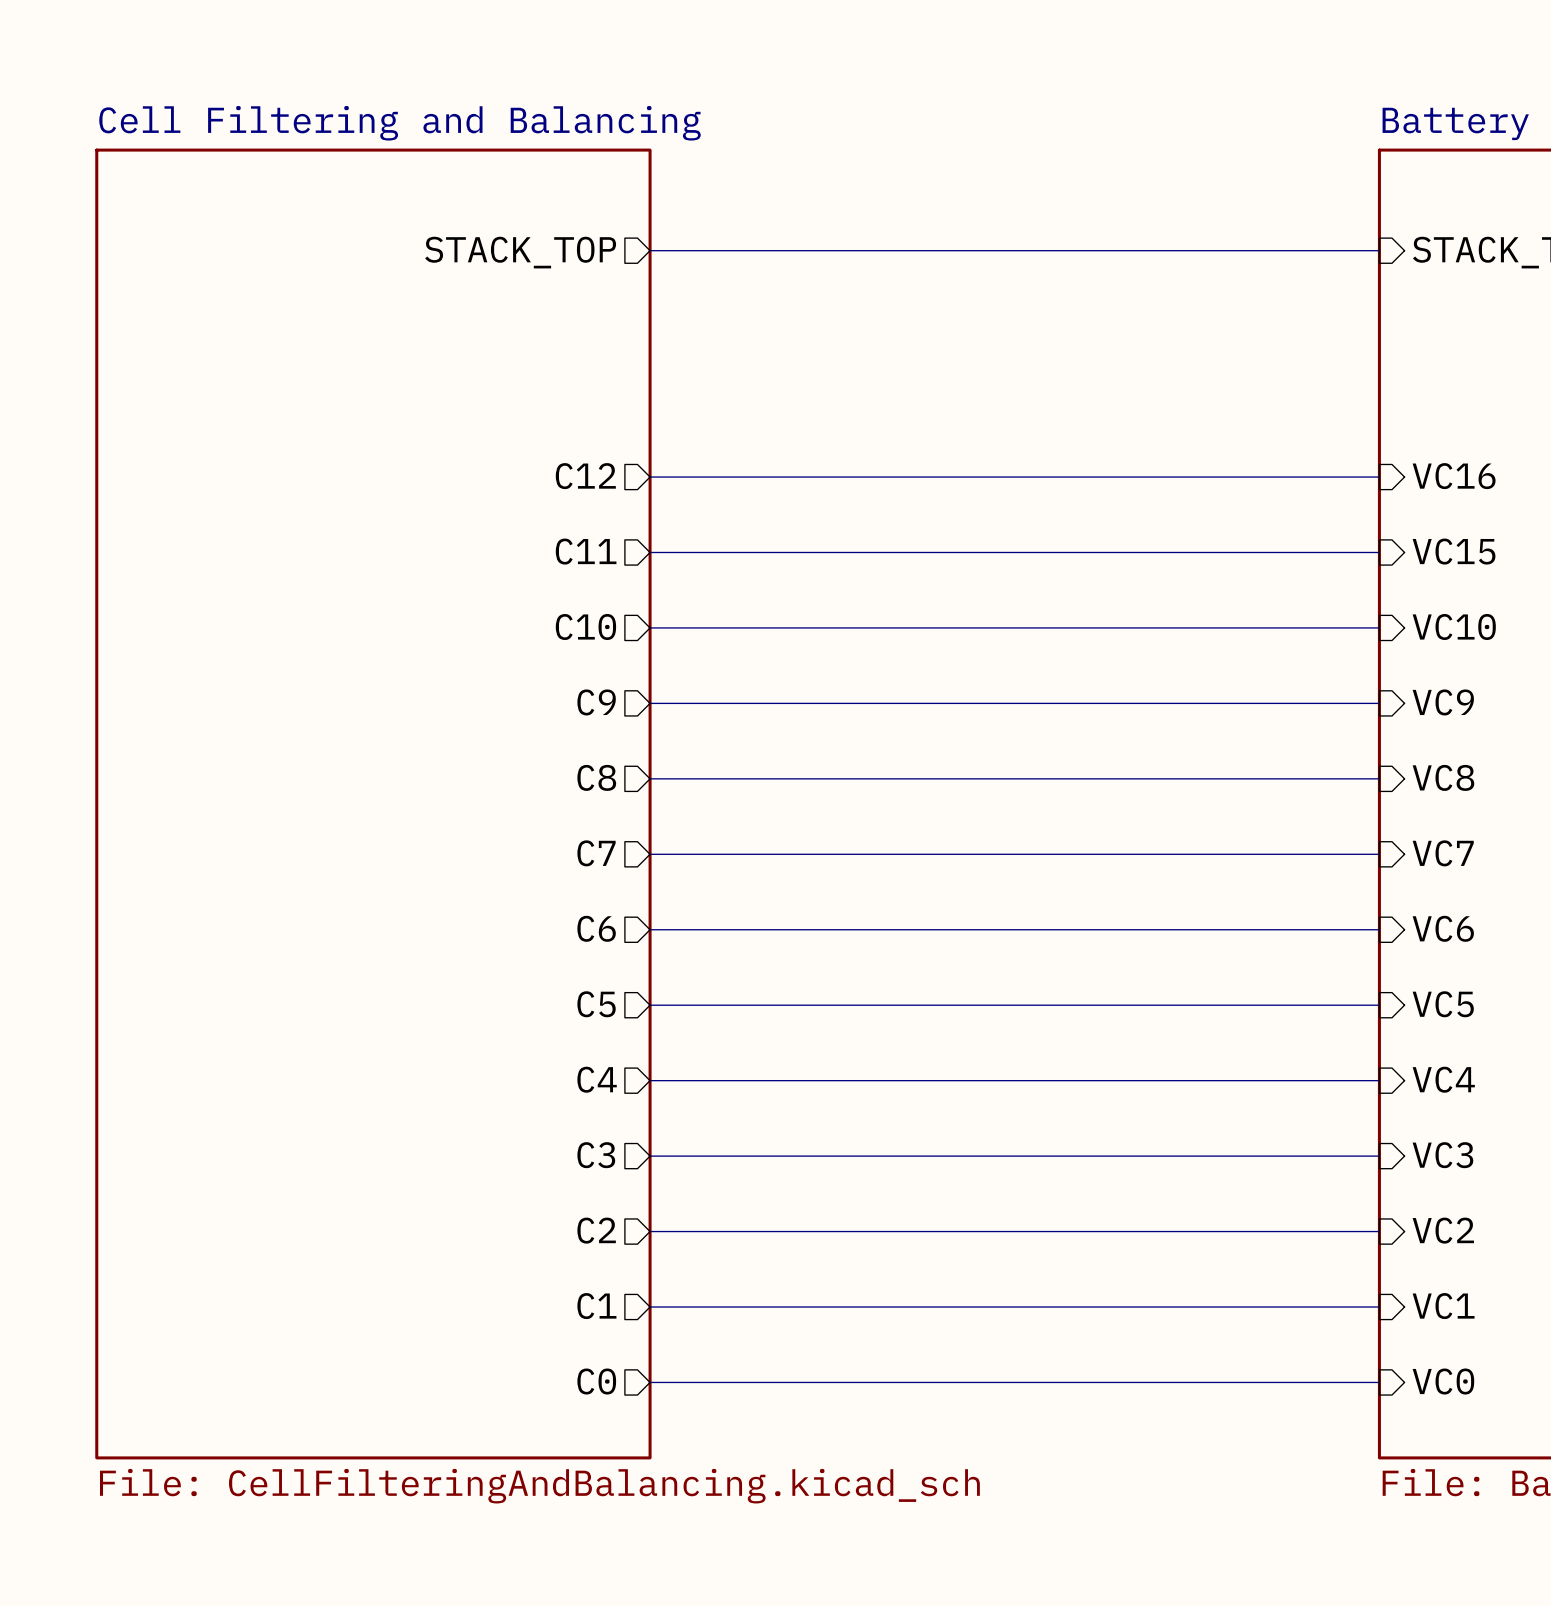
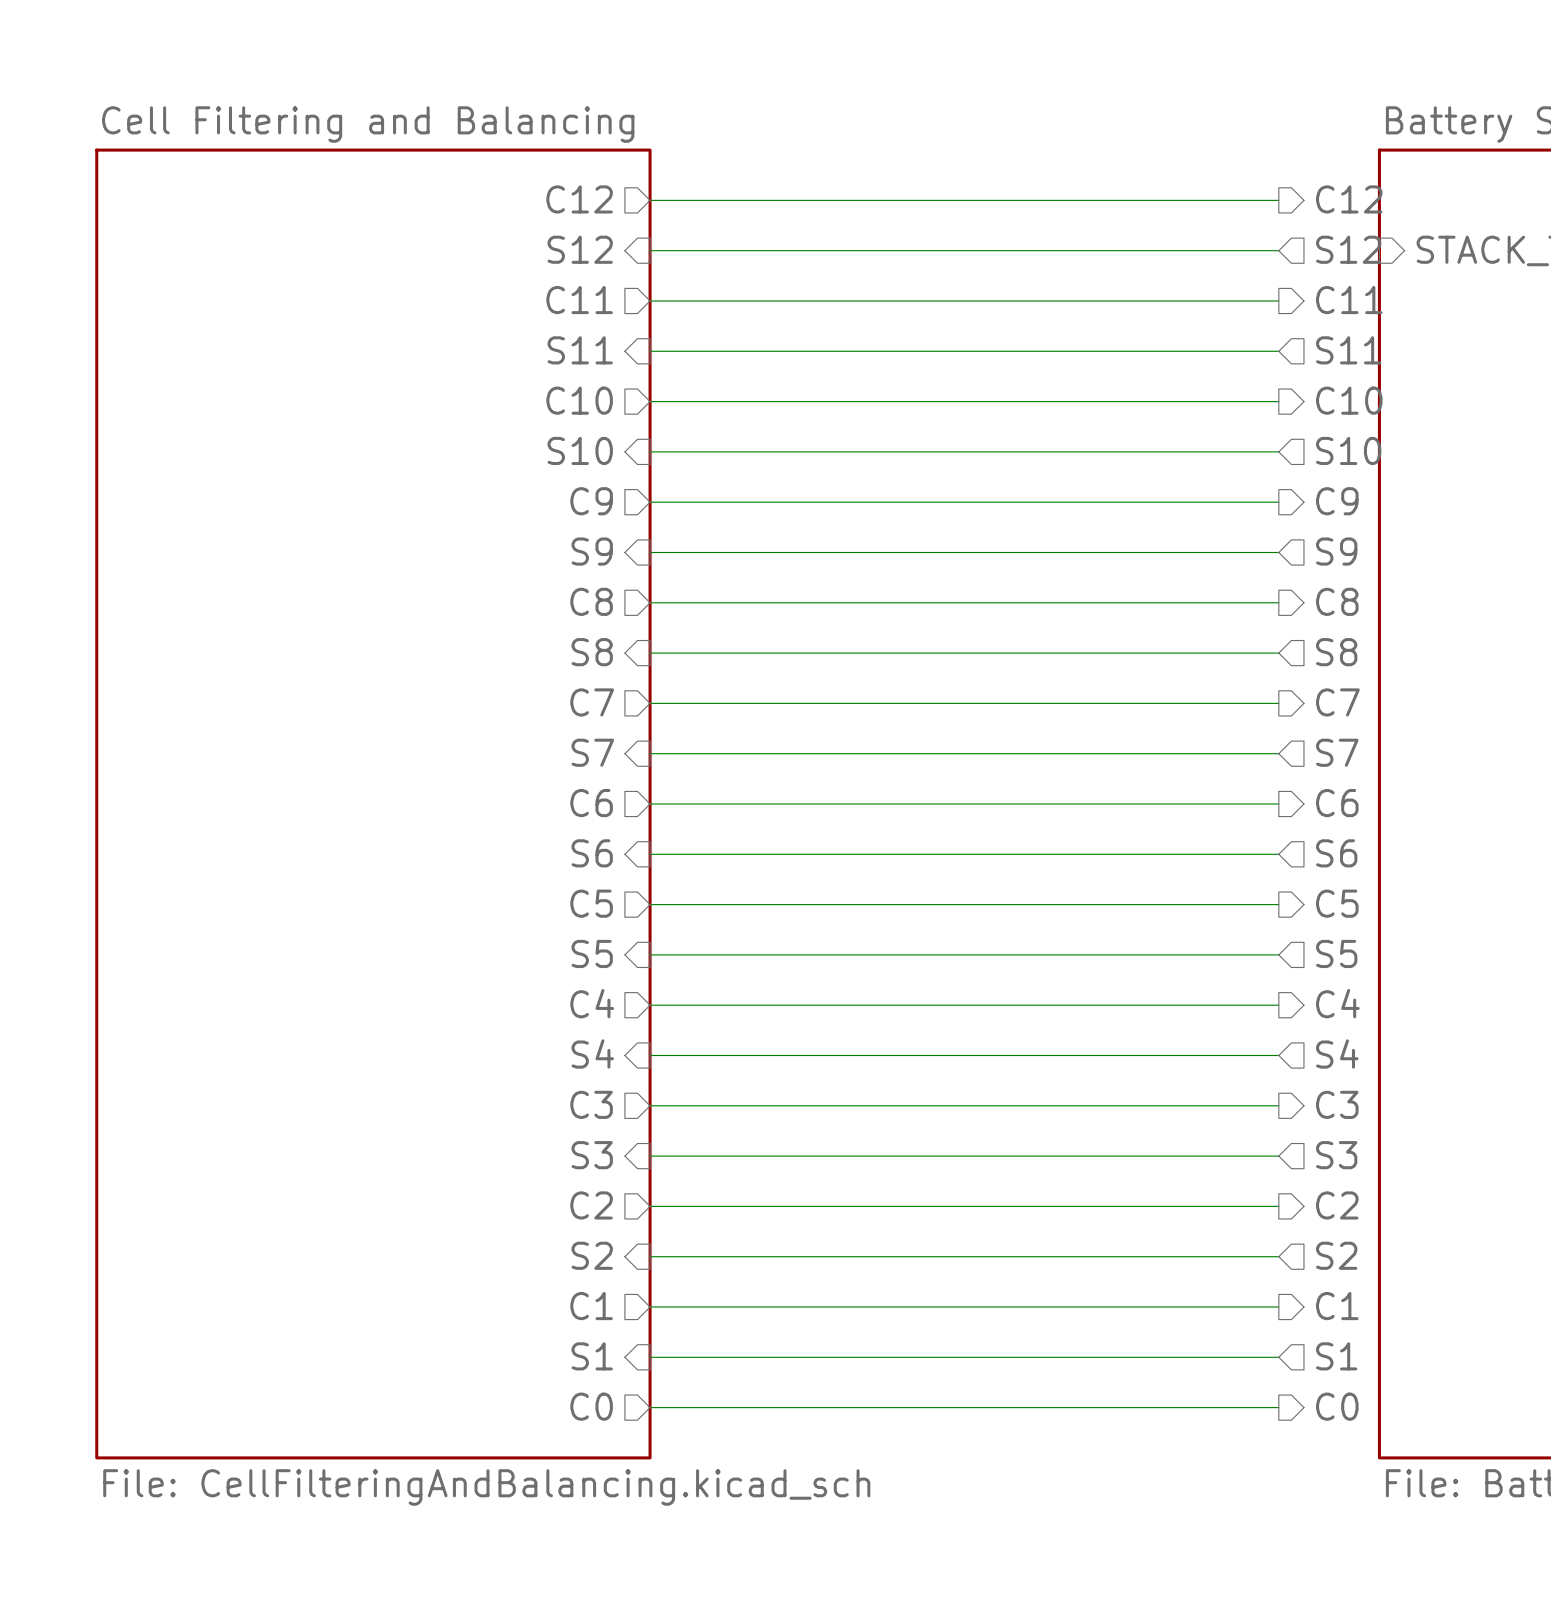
sheet pin: none -> C12 (1349, 199)
wire: none -> (650, 200) (1278, 200)
sheet pin: none -> S12 (1348, 249)
wire: (1278, 250) (1379, 250) -> none
sheet pin shape: output (520, 252) -> input (580, 249)
sheet pin: STACK_TOP (520, 252) -> S12 (580, 249)
sheet pin: none -> C11 (579, 300)
wire: none -> (650, 300) (1278, 300)
sheet pin: none -> C11 (1349, 300)
sheet pin: none -> S11 (580, 350)
sheet pin: none -> S11 (1348, 350)
wire: none -> (650, 351) (1278, 351)
sheet pin: none -> C10 (1349, 400)
wire: none -> (650, 401) (1278, 401)
sheet pin: none -> S10 (580, 450)
sheet pin: none -> S10 (1348, 450)
wire: none -> (650, 451) (1278, 451)
sheet pin position: C12 (585, 476) -> C12 (579, 199)
sheet pin: VC16 (1454, 476) -> none
wire: (650, 477) (1379, 477) -> none
sheet pin: none -> C9 (591, 501)
sheet pin: none -> C9 (1337, 501)
wire: none -> (650, 502) (1278, 502)
sheet pin shape: output (586, 551) -> input (592, 551)
sheet pin: C11 (586, 551) -> S9 (592, 551)
sheet pin: none -> S9 (1336, 551)
sheet pin: VC15 (1454, 551) -> none
wire: (1278, 552) (1379, 552) -> none
sheet pin: none -> C8 (1337, 601)
wire: none -> (650, 602) (1278, 602)
sheet pin position: C10 (585, 627) -> C10 (579, 400)
wire: (650, 627) (1379, 627) -> none
sheet pin: VC10 (1454, 627) -> none
sheet pin: none -> S8 (592, 652)
sheet pin: none -> S8 (1336, 652)
wire: none -> (650, 653) (1278, 653)
sheet pin: C9 (596, 702) -> C7 (592, 702)
sheet pin: none -> C7 (1337, 702)
sheet pin: VC9 (1443, 702) -> none
wire: (1278, 703) (1379, 703) -> none
sheet pin: none -> S7 (592, 752)
sheet pin: none -> S7 (1337, 752)
wire: none -> (650, 753) (1278, 753)
sheet pin position: C8 (596, 777) -> C8 (591, 601)
sheet pin: VC8 (1443, 777) -> none
wire: (650, 778) (1379, 778) -> none
wire: none -> (650, 803) (1278, 803)
sheet pin: none -> C6 (1337, 803)
sheet pin shape: output (596, 853) -> input (592, 853)
sheet pin: C7 (596, 853) -> S6 (592, 853)
sheet pin: none -> S6 (1336, 853)
sheet pin: VC7 (1443, 853) -> none
wire: (1278, 854) (1379, 854) -> none
sheet pin: none -> C5 (591, 903)
sheet pin: none -> C5 (1337, 903)
wire: none -> (650, 904) (1278, 904)
sheet pin position: C6 (596, 928) -> C6 (591, 803)
sheet pin: VC6 (1443, 928) -> none
wire: (650, 929) (1379, 929) -> none
sheet pin: none -> S5 (592, 953)
sheet pin: none -> S5 (1336, 953)
wire: none -> (650, 954) (1278, 954)
sheet pin: C5 (596, 1004) -> C4 (592, 1003)
sheet pin: none -> C4 (1337, 1003)
sheet pin: VC5 (1443, 1004) -> none
wire: (1278, 1005) (1379, 1005) -> none
sheet pin: none -> S4 (592, 1053)
sheet pin: none -> S4 (1337, 1053)
wire: none -> (650, 1055) (1278, 1055)
sheet pin: C4 (597, 1079) -> none
sheet pin: VC4 (1443, 1079) -> none
wire: (650, 1080) (1379, 1080) -> none
sheet pin: none -> C3 (591, 1104)
sheet pin: none -> C3 (1337, 1104)
wire: none -> (650, 1105) (1278, 1105)
sheet pin shape: output (596, 1155) -> input (592, 1155)
sheet pin: C3 (596, 1155) -> S3 (592, 1155)
sheet pin: none -> S3 (1336, 1155)
sheet pin: VC3 (1442, 1155) -> none
wire: (1278, 1156) (1379, 1156) -> none
sheet pin: none -> C2 (1337, 1205)
wire: none -> (650, 1206) (1278, 1206)
sheet pin position: C2 (596, 1230) -> C2 (591, 1205)
sheet pin: VC2 (1443, 1230) -> none
wire: (650, 1231) (1379, 1231) -> none
sheet pin: none -> S2 (592, 1255)
sheet pin: none -> S2 (1336, 1255)
wire: none -> (650, 1256) (1278, 1256)
sheet pin: none -> C1 (1337, 1306)
sheet pin: VC1 (1443, 1306) -> none
wire: (1278, 1307) (1379, 1307) -> none
sheet pin: none -> S1 (592, 1356)
sheet pin: none -> S1 (1336, 1356)
wire: none -> (650, 1357) (1278, 1357)
sheet pin position: C0 (596, 1381) -> C0 (591, 1406)
sheet pin: VC0 (1443, 1381) -> none
wire: (650, 1382) (1379, 1382) -> none
sheet pin: none -> C0 (1337, 1406)
wire: none -> (650, 1407) (1278, 1407)

